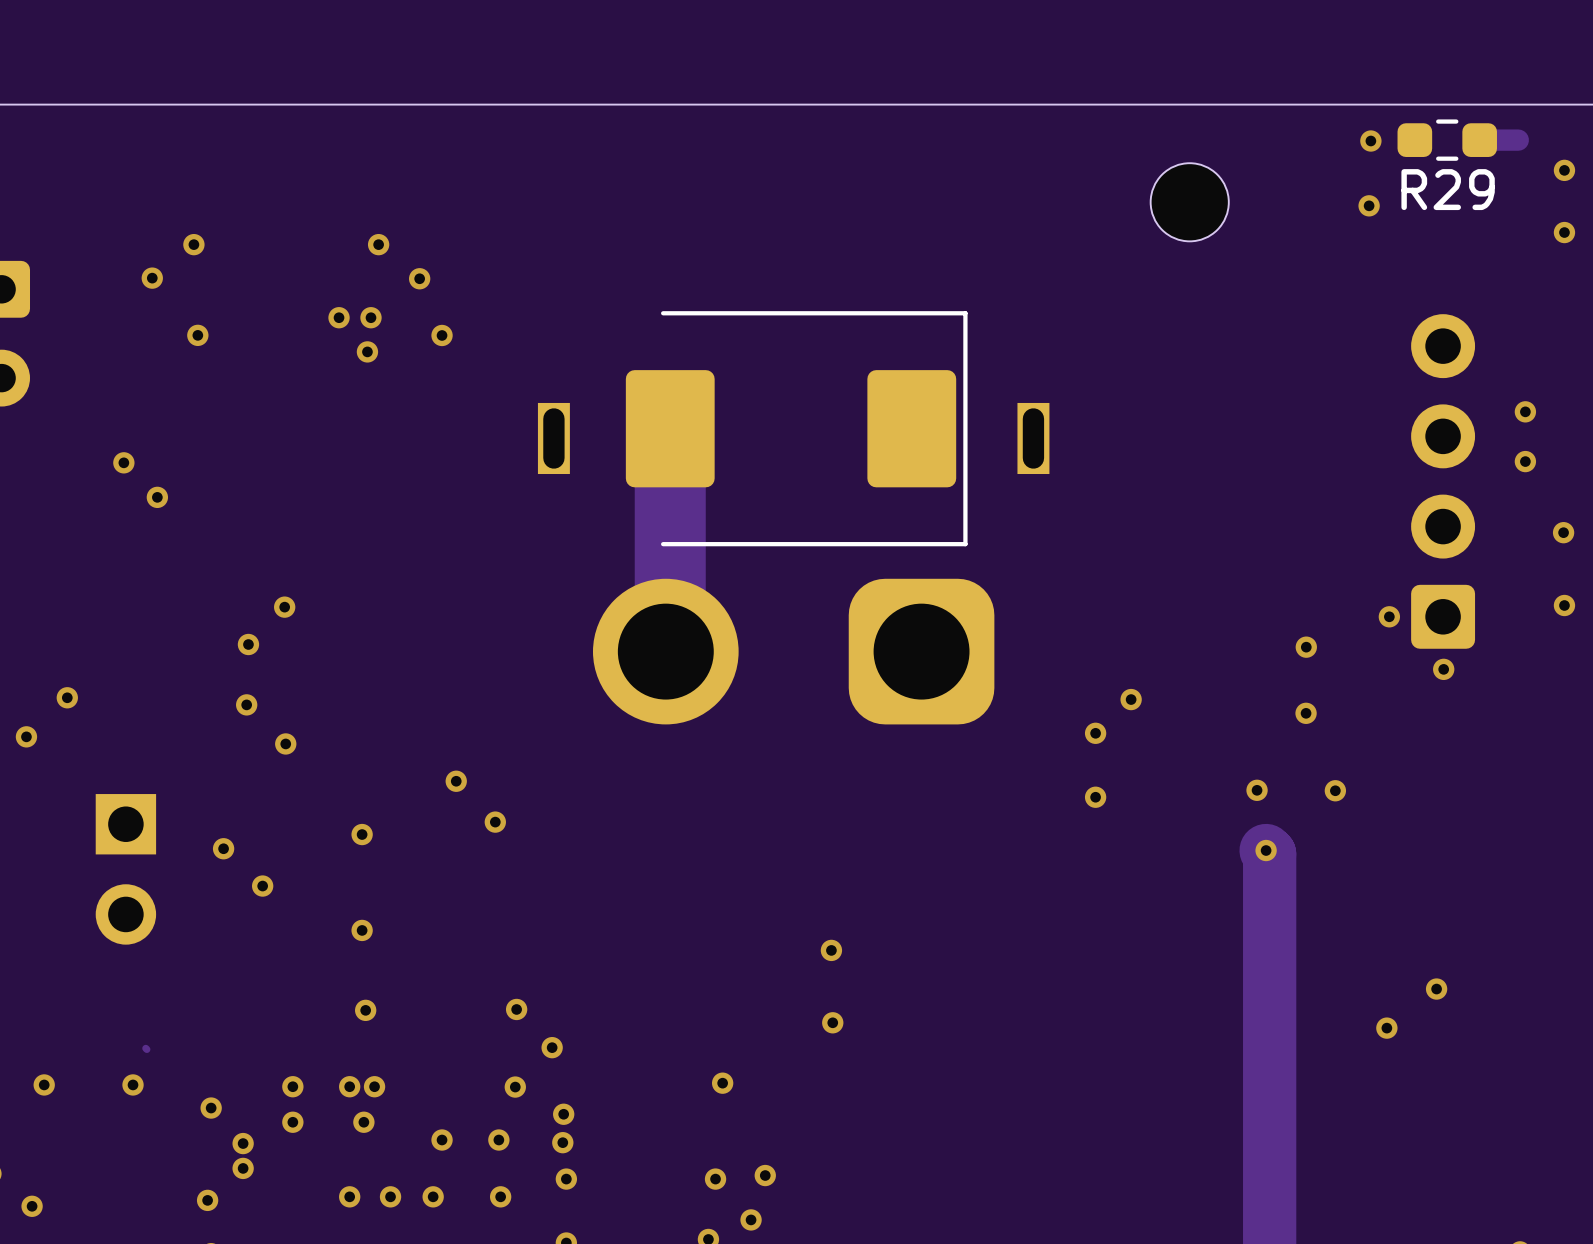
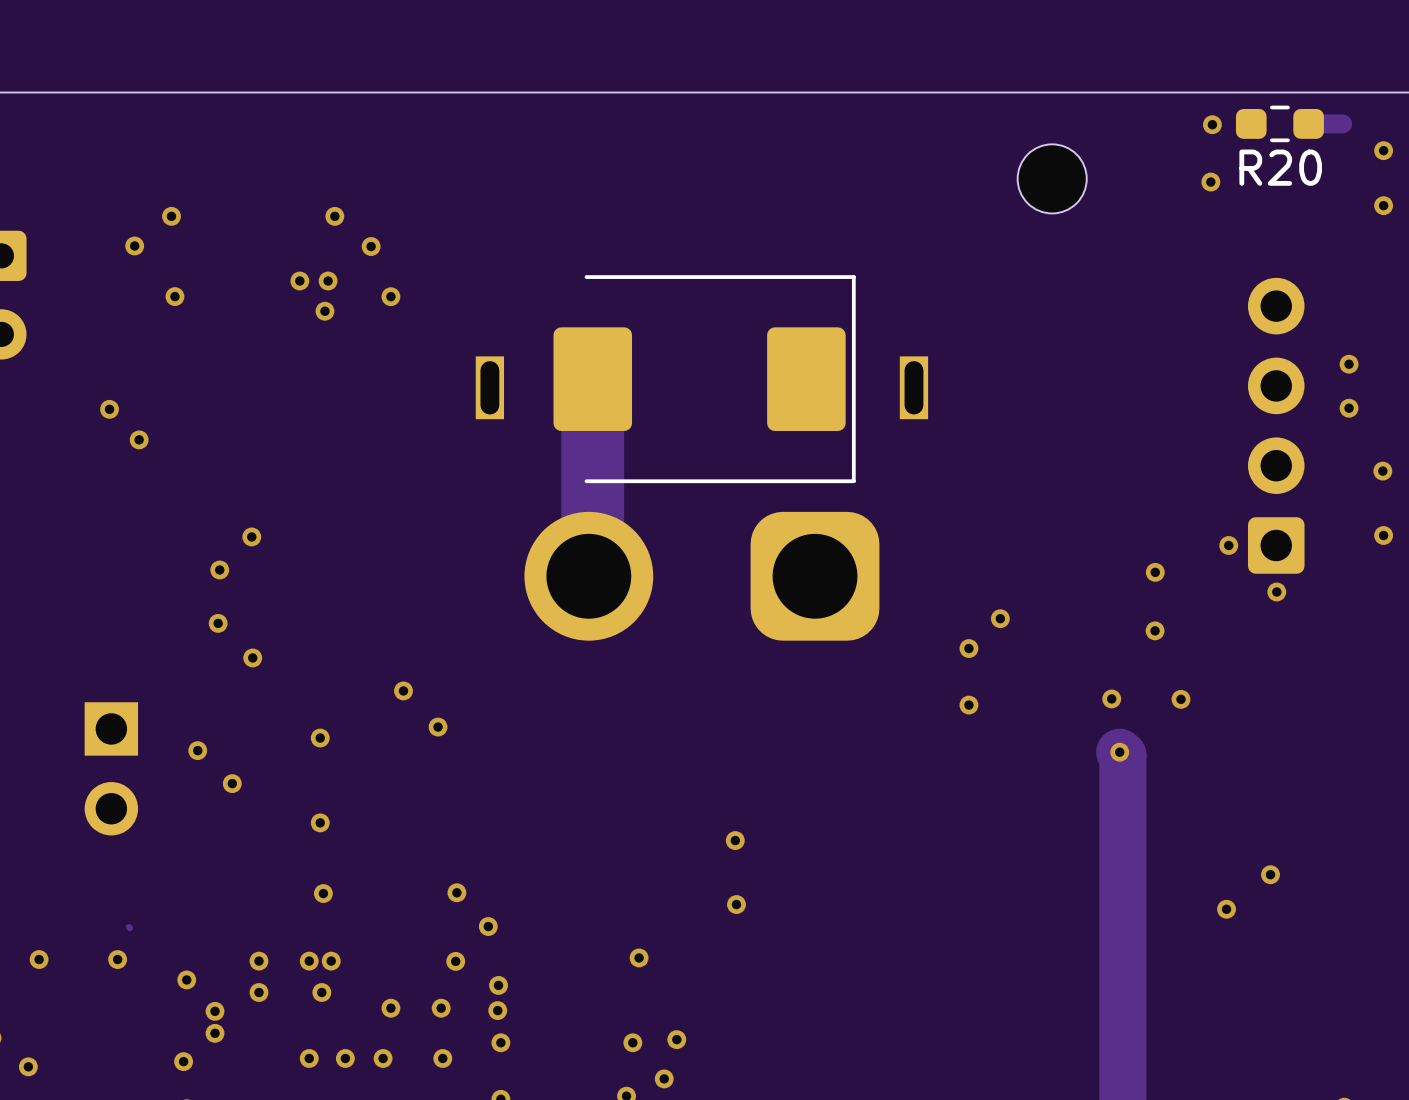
R29 name: R29 (1448, 189) -> R20 (1280, 167)
via: (67, 697) -> none
via: (26, 736) -> none

